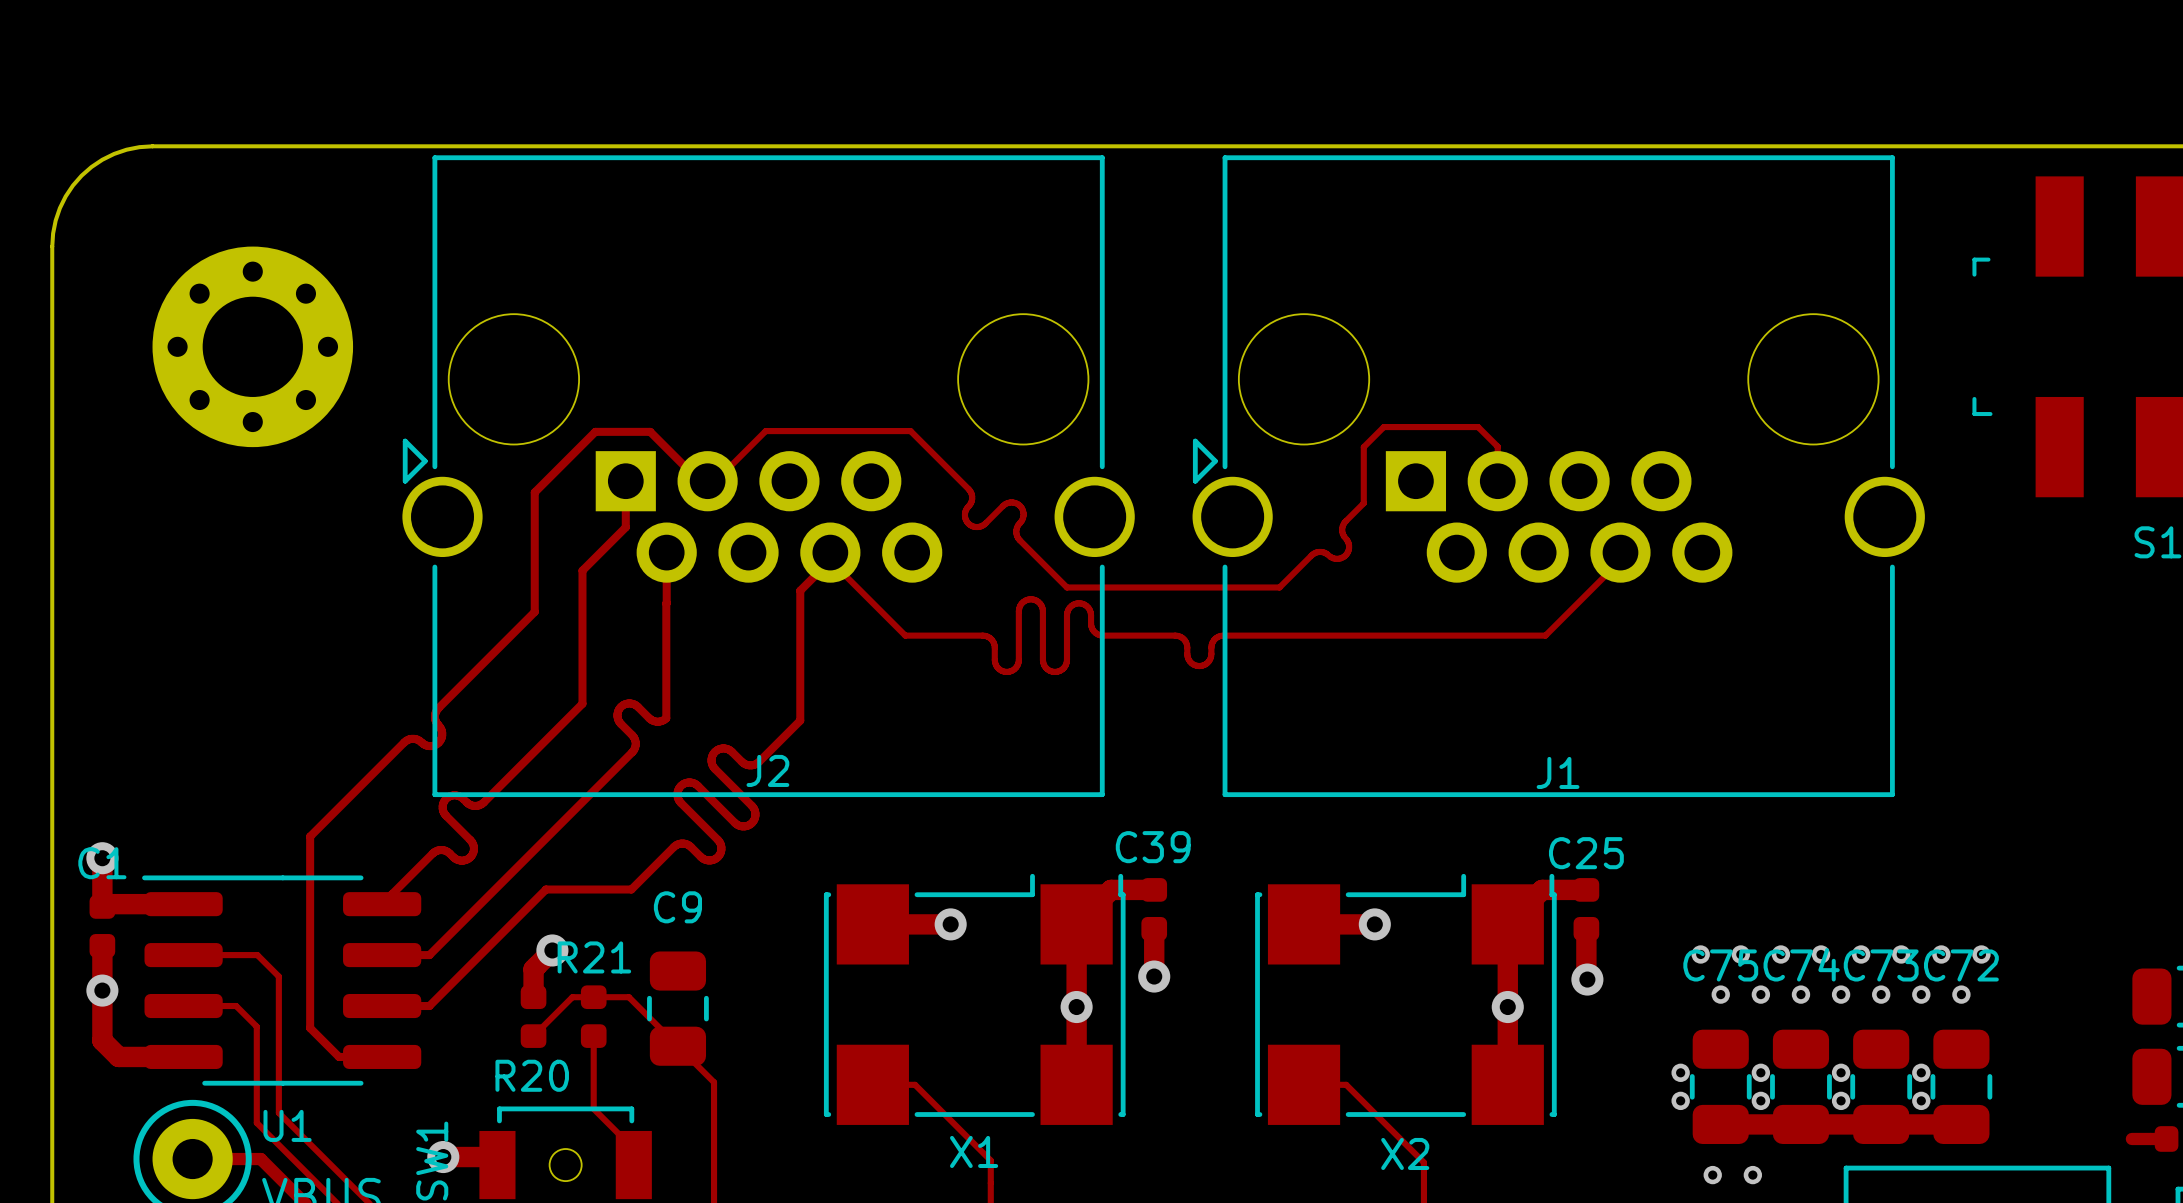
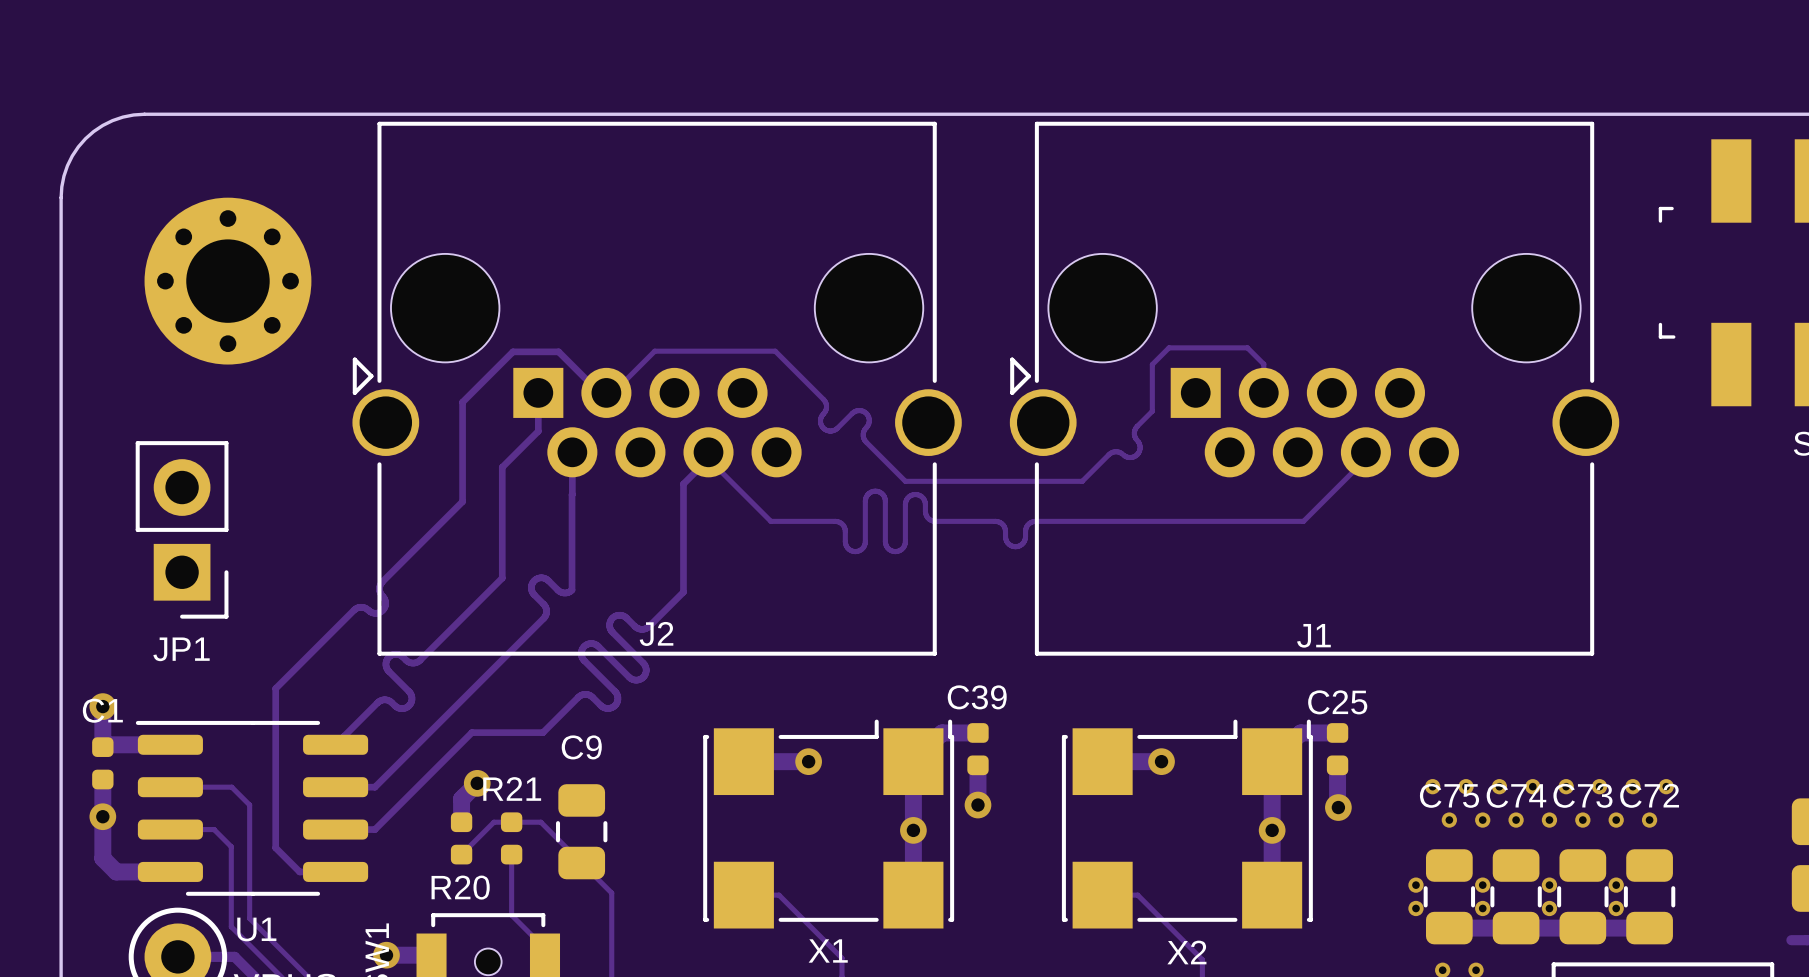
JP1: none -> (182, 529)

